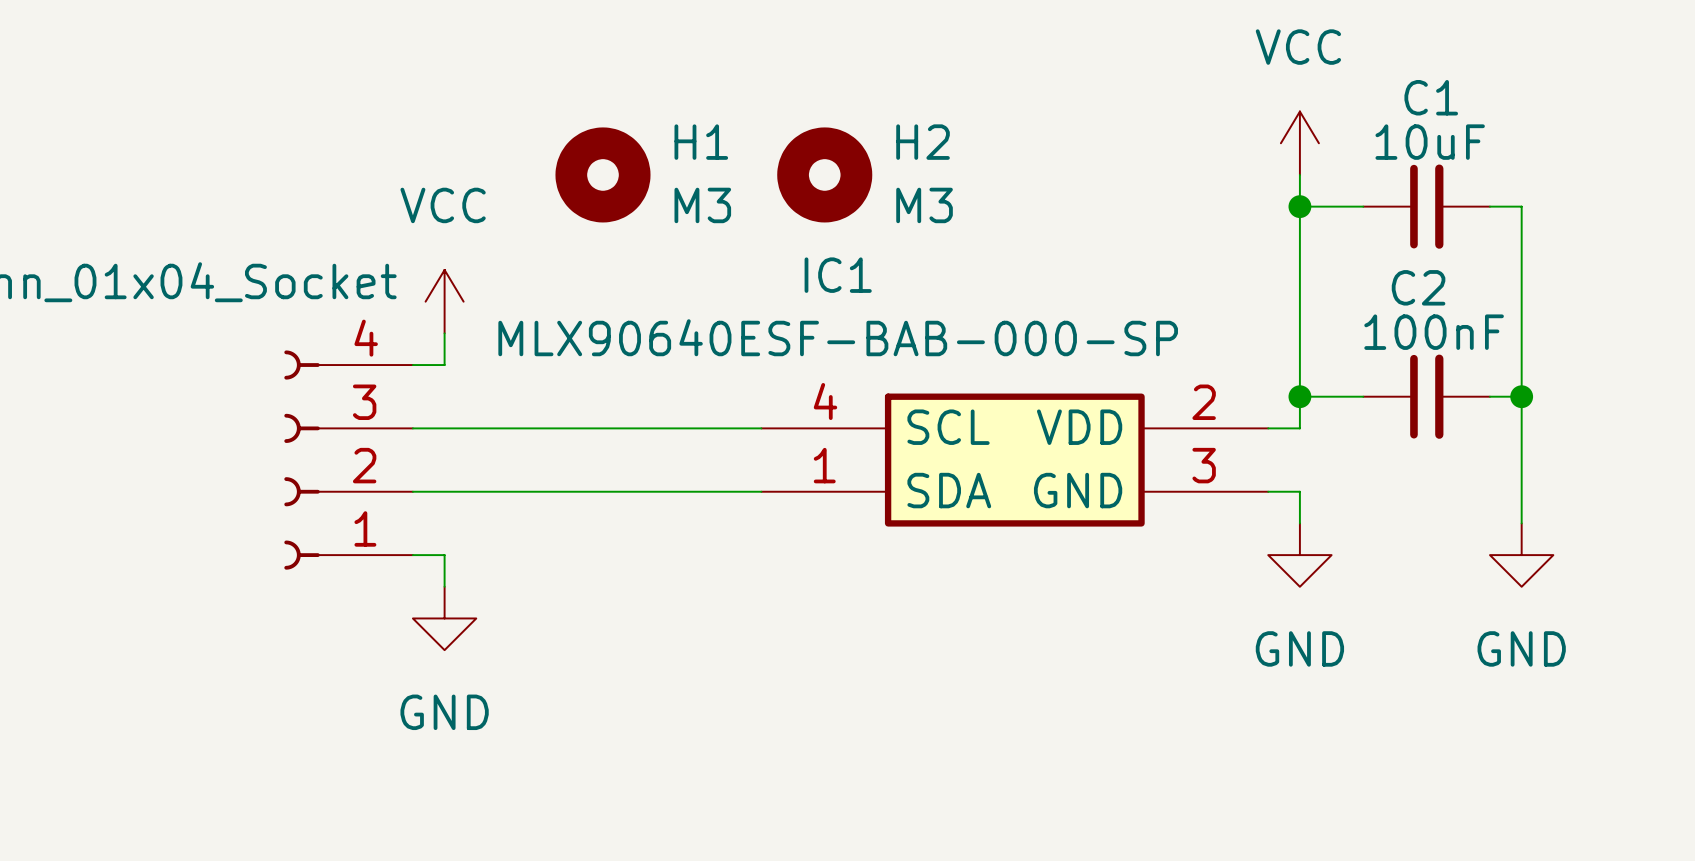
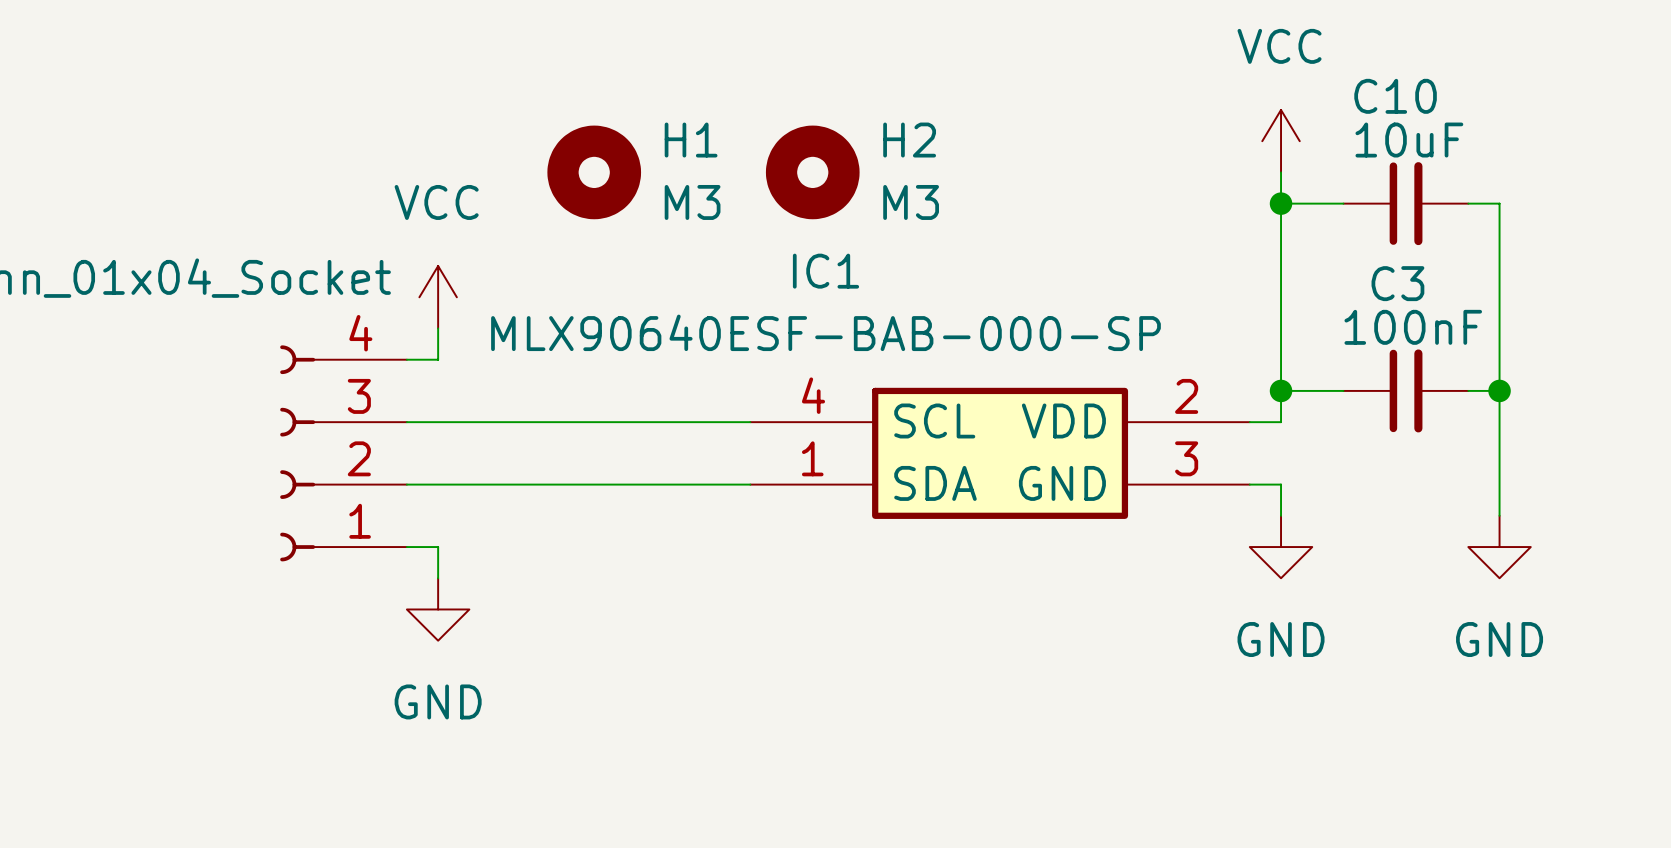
C1 name: C1 (1431, 97) -> C10 (1395, 96)
C2 name: C2 (1418, 287) -> C3 (1397, 283)

